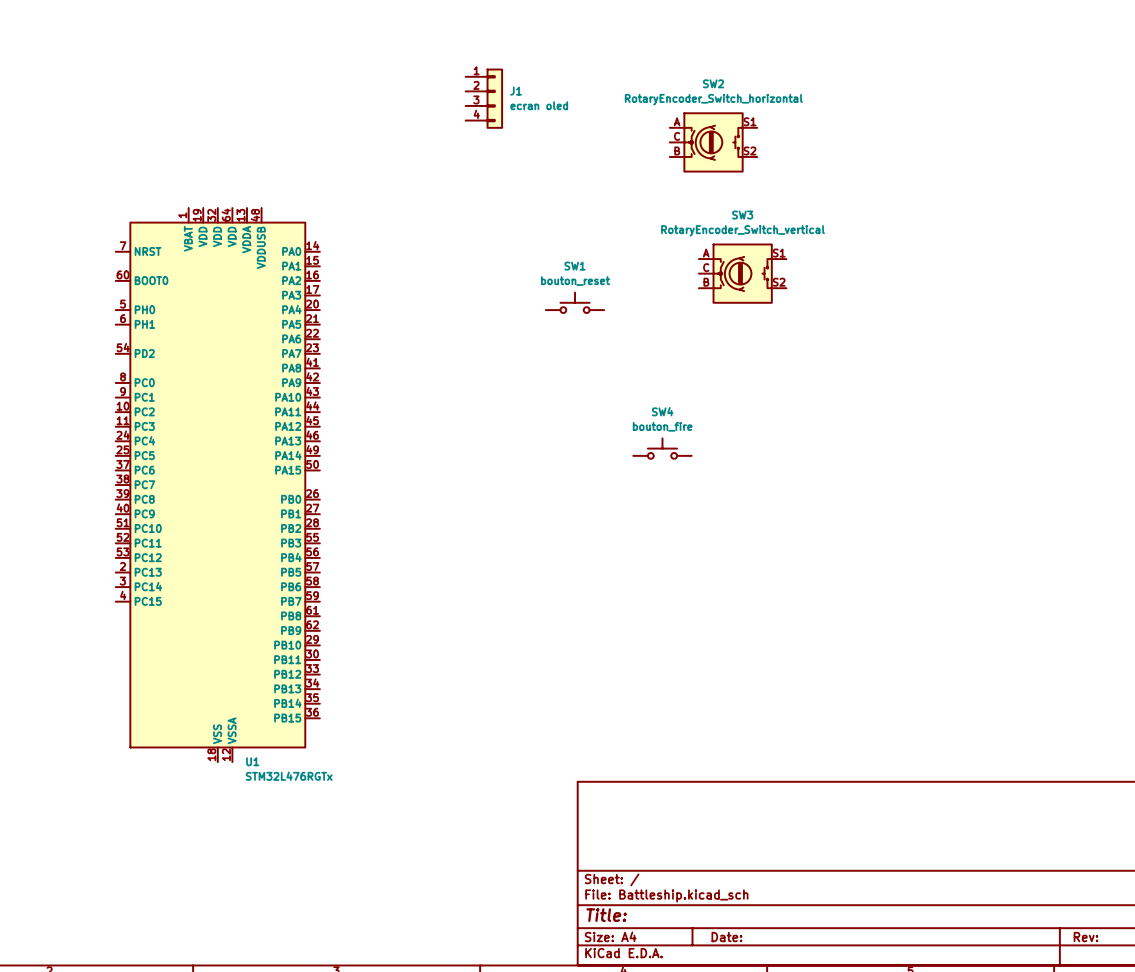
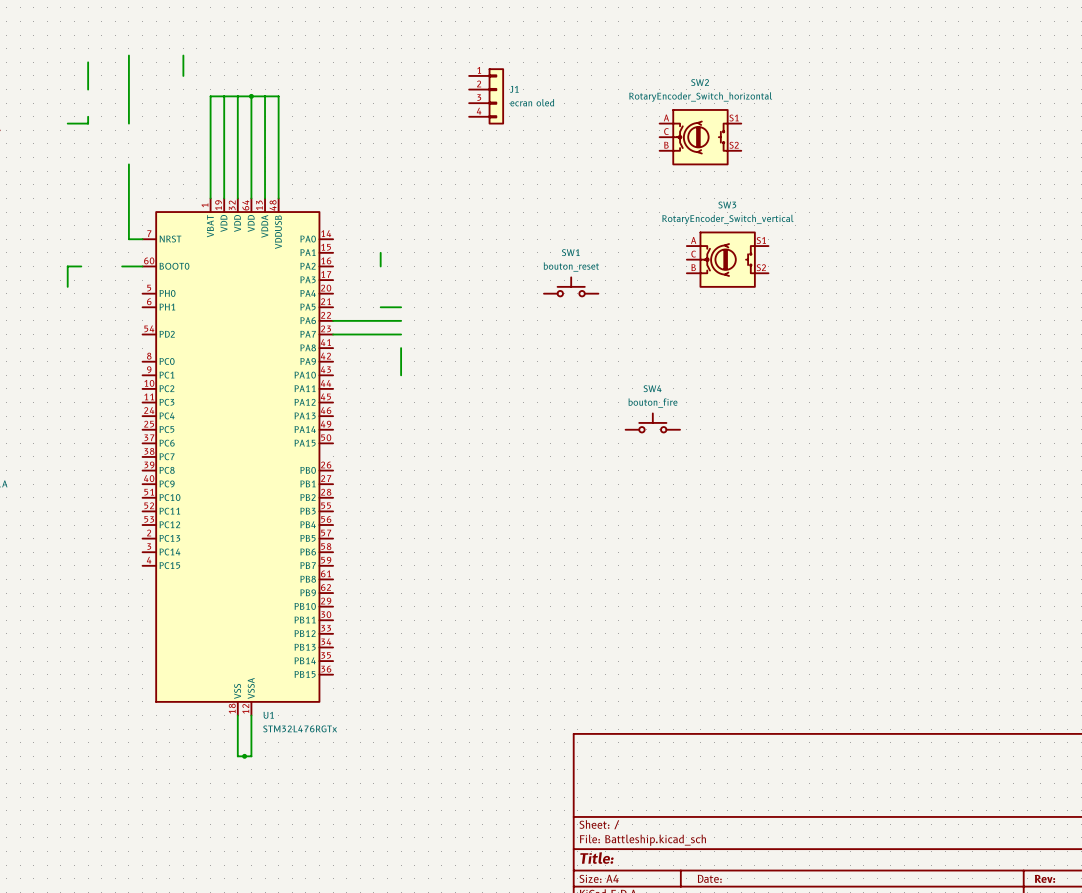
wire: none -> (128, 55) (128, 123)
wire: none -> (183, 55) (183, 75)
wire: none -> (88, 62) (88, 89)
wire: none -> (224, 96) (224, 198)
wire: none -> (237, 96) (237, 198)
wire: none -> (251, 96) (251, 198)
junction: none -> (251, 96)
wire: none -> (265, 96) (265, 198)
wire: none -> (88, 116) (88, 123) (67, 123)
wire: none -> (128, 164) (128, 239) (142, 239)
wire: none -> (210, 198) (210, 96) (278, 96) (278, 198)
wire: none -> (380, 252) (380, 266)
wire: none -> (81, 266) (67, 266) (67, 286)
wire: none -> (122, 266) (142, 266)
wire: none -> (380, 307) (401, 307)
wire: none -> (333, 320) (401, 320)
wire: none -> (333, 334) (401, 334)
wire: none -> (401, 348) (401, 375)
wire: none -> (237, 715) (237, 756) (251, 756) (251, 715)
junction: none -> (244, 756)

